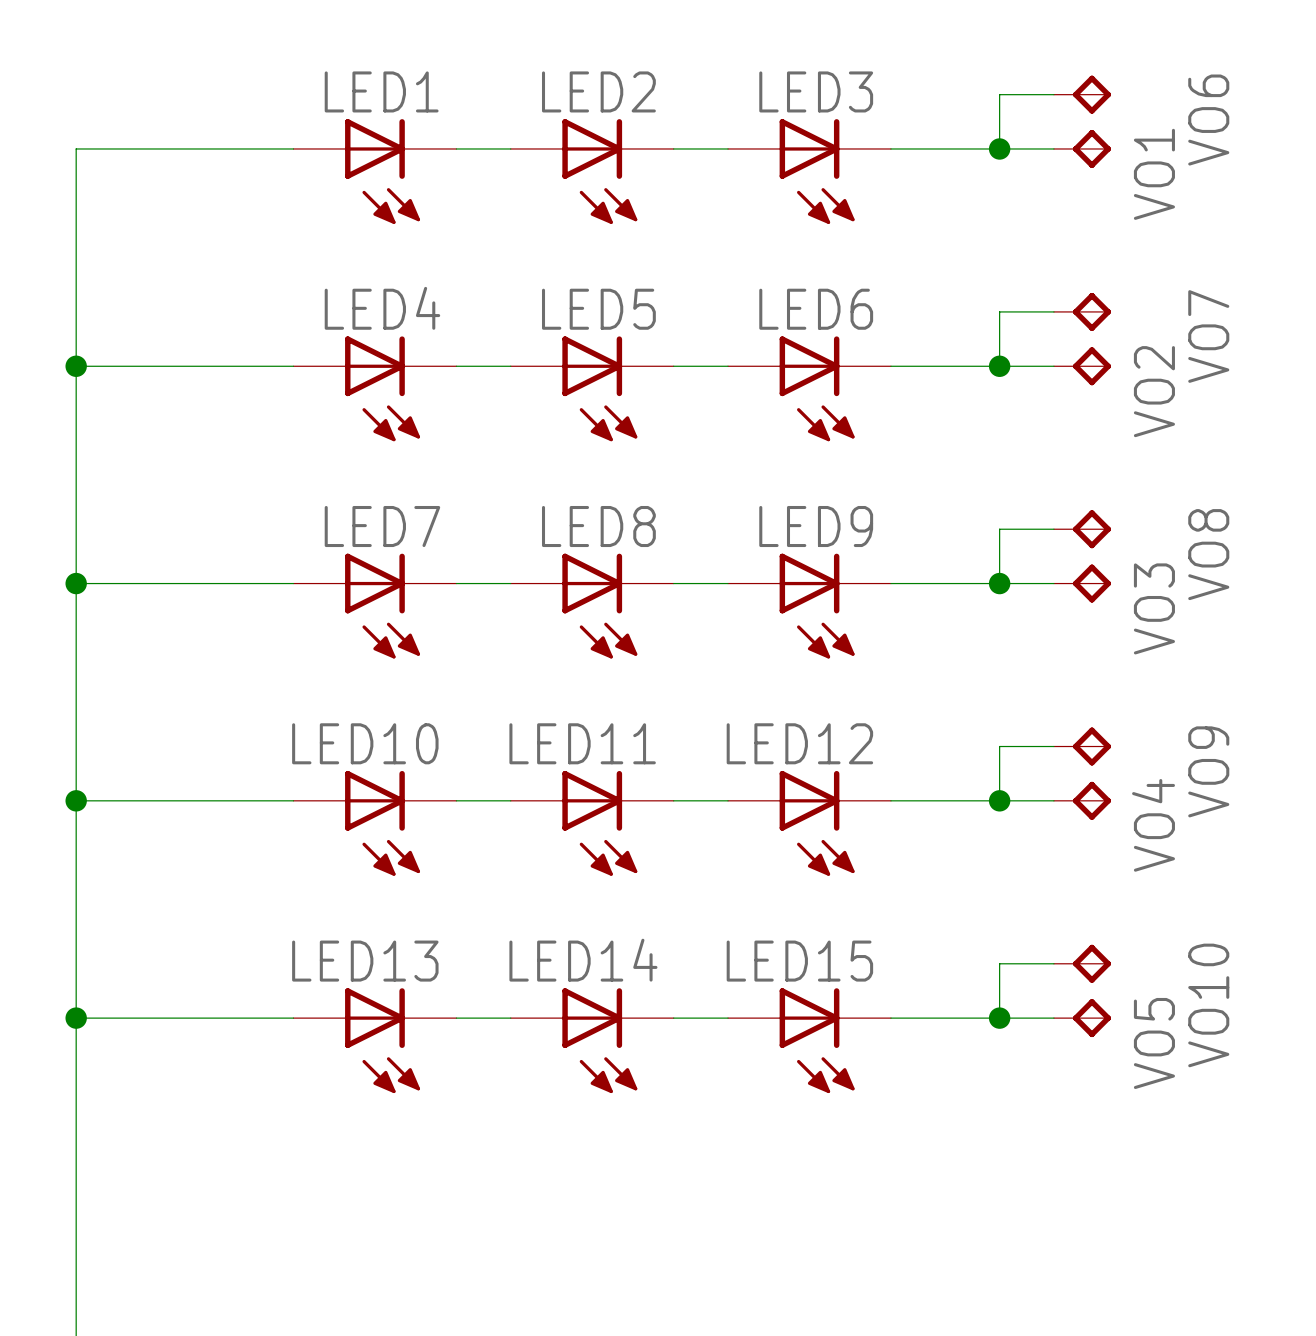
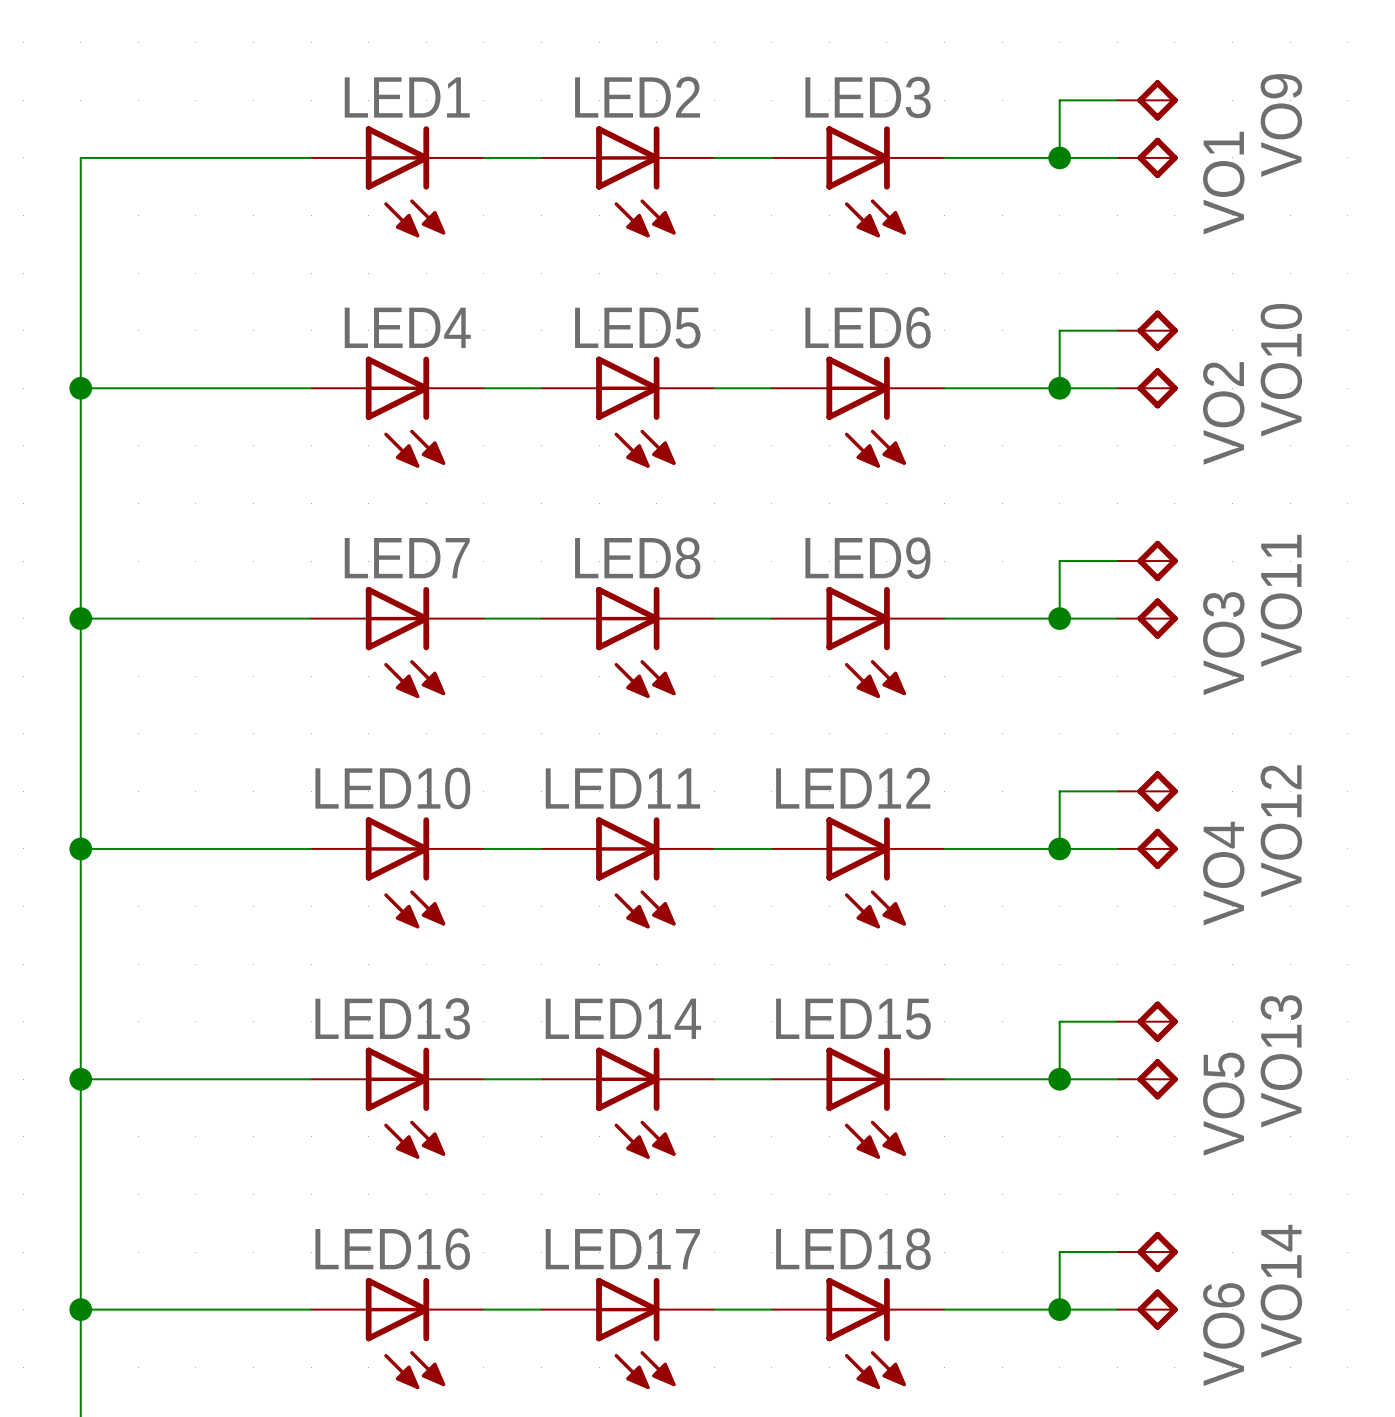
VO6 name: VO6 (1208, 120) -> VO9 (1281, 125)
VO7 name: VO7 (1208, 336) -> VO10 (1281, 370)
VO8 name: VO8 (1208, 554) -> VO11 (1281, 600)
VO9 name: VO9 (1208, 771) -> VO12 (1281, 831)
VO10 name: VO10 (1208, 1005) -> VO13 (1281, 1061)
wire: none -> (1117, 1252) (1059, 1252) (1059, 1309)
VO14: none -> (1147, 1252)
wire: none -> (80, 1309) (311, 1309)
junction: none -> (80, 1309)
wire: none -> (483, 1309) (541, 1309)
wire: none -> (714, 1309) (771, 1309)
wire: none -> (944, 1309) (1117, 1309)
junction: none -> (1059, 1309)
VO6: none -> (1147, 1309)
LED16: none -> (397, 1333)
LED17: none -> (627, 1333)
LED18: none -> (858, 1333)

